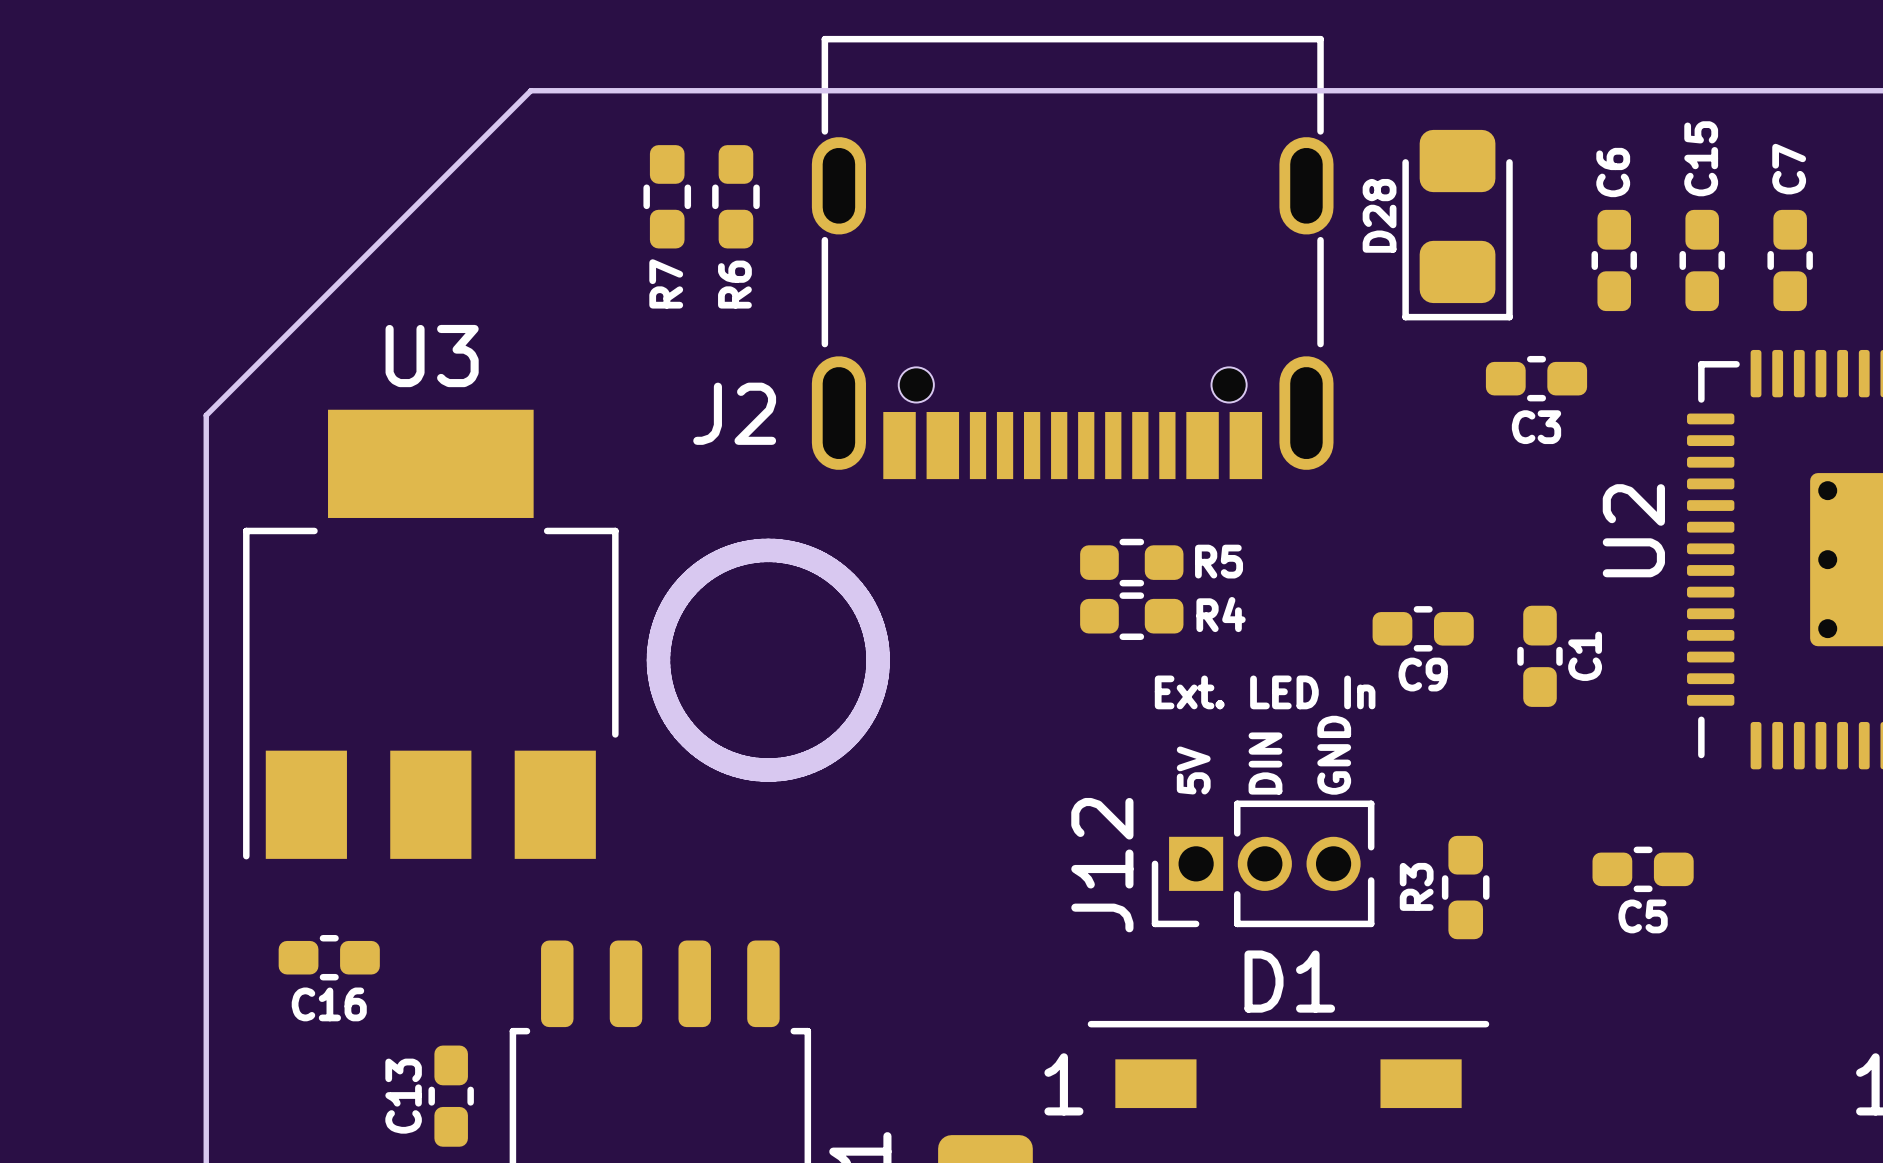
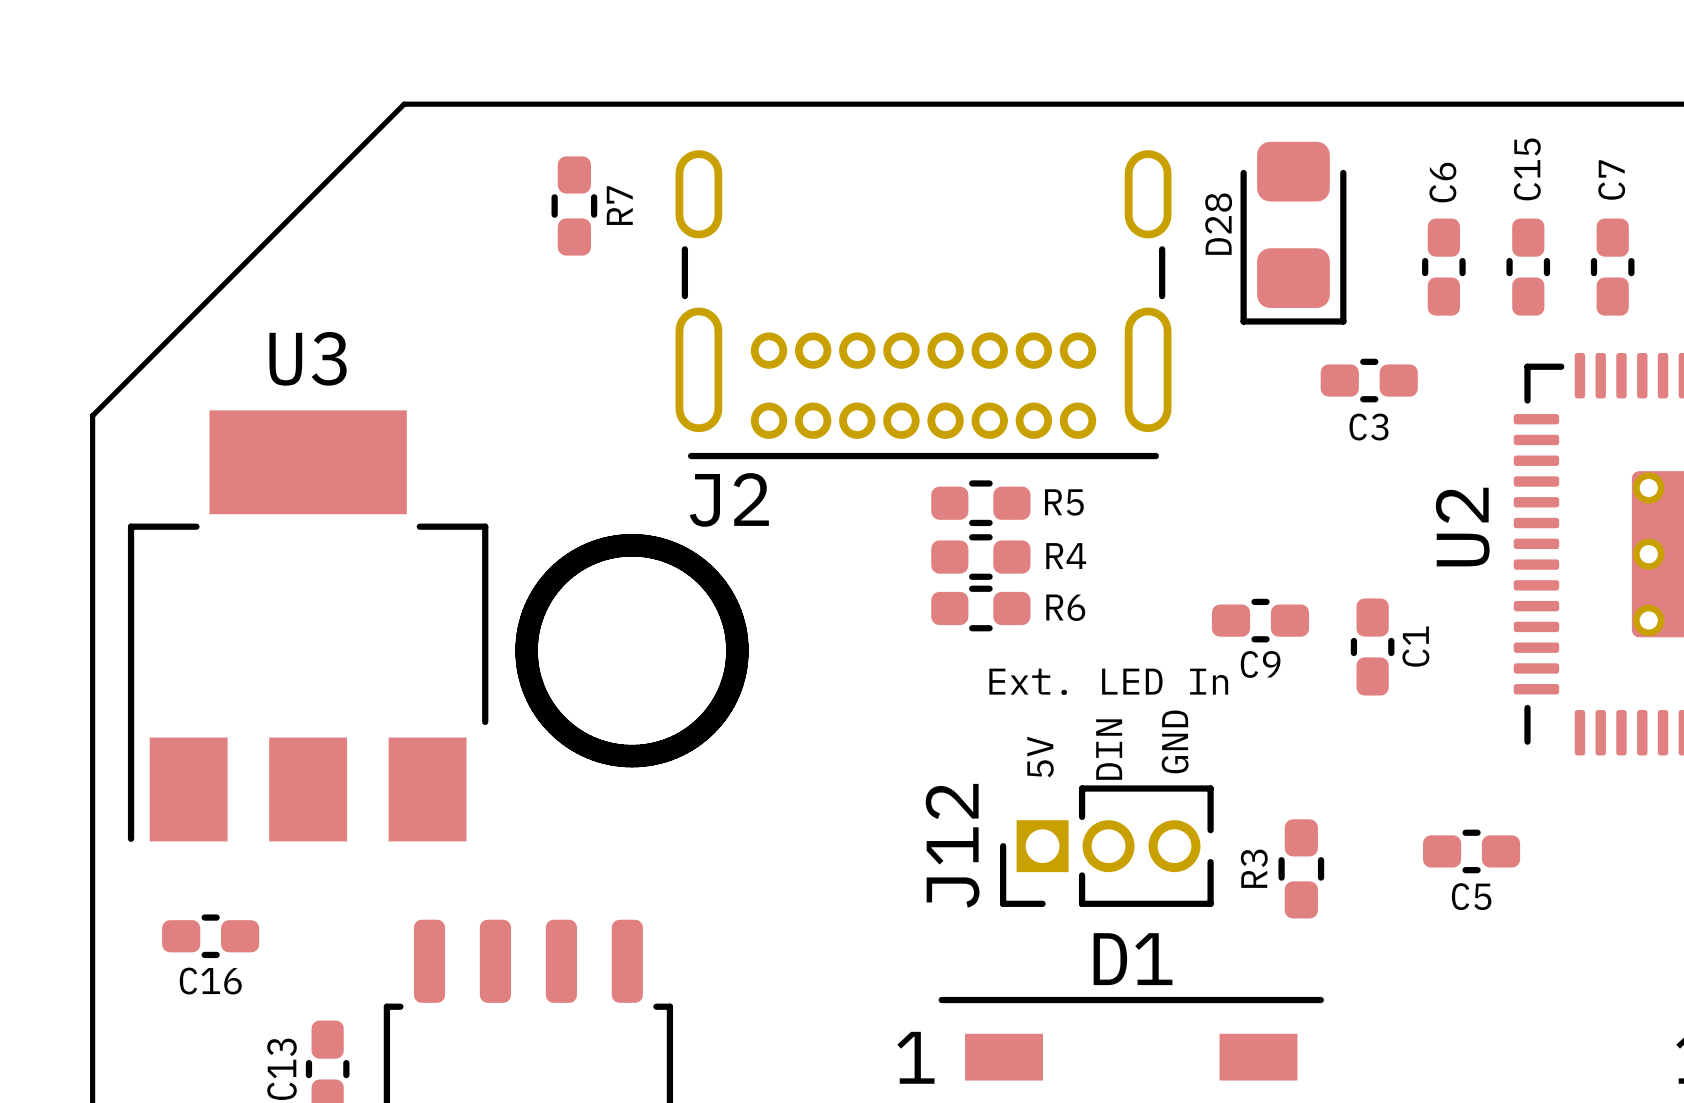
J2 footprint: [811, 35, 1334, 480] -> [675, 150, 1172, 460]
R7 position: (667, 196) -> (574, 205)
R6: (735, 196) -> none
R7 name position: R7 (666, 283) -> R7 (619, 205)
J2 name position: J2 (734, 413) -> J2 (729, 499)
R5: none -> (980, 503)
R5 name: R5 (1219, 561) -> R4 (1066, 556)
R4 name: R4 (1221, 614) -> R6 (1065, 607)

